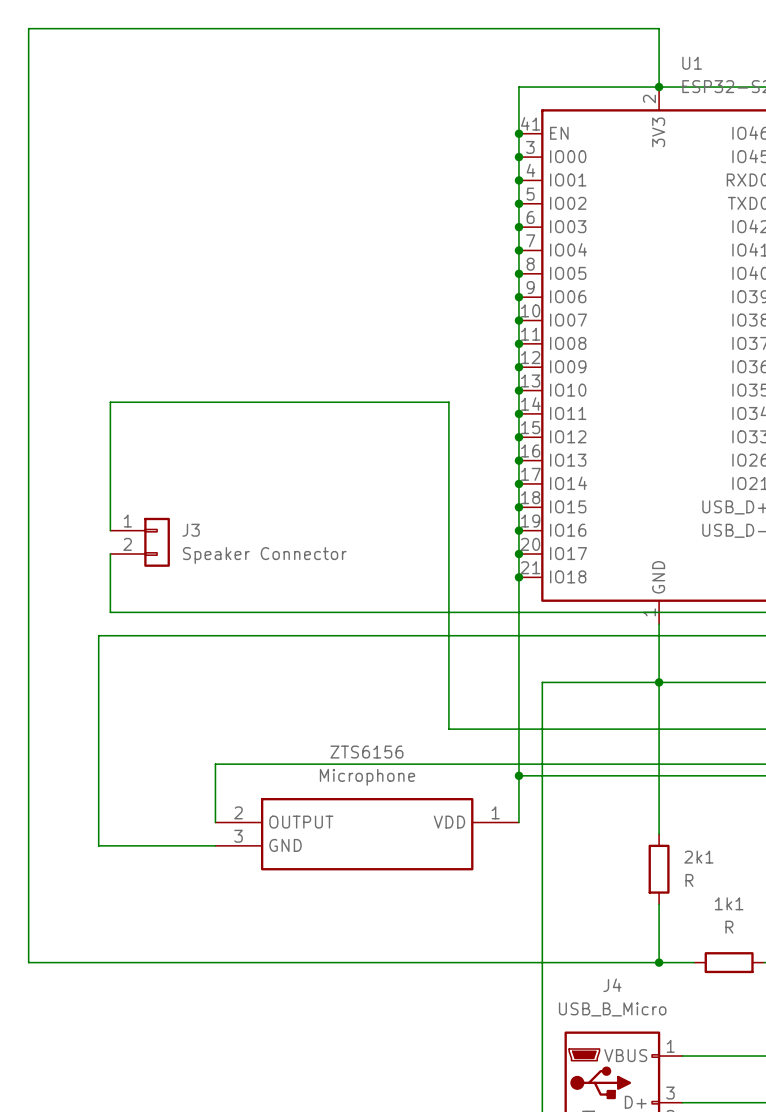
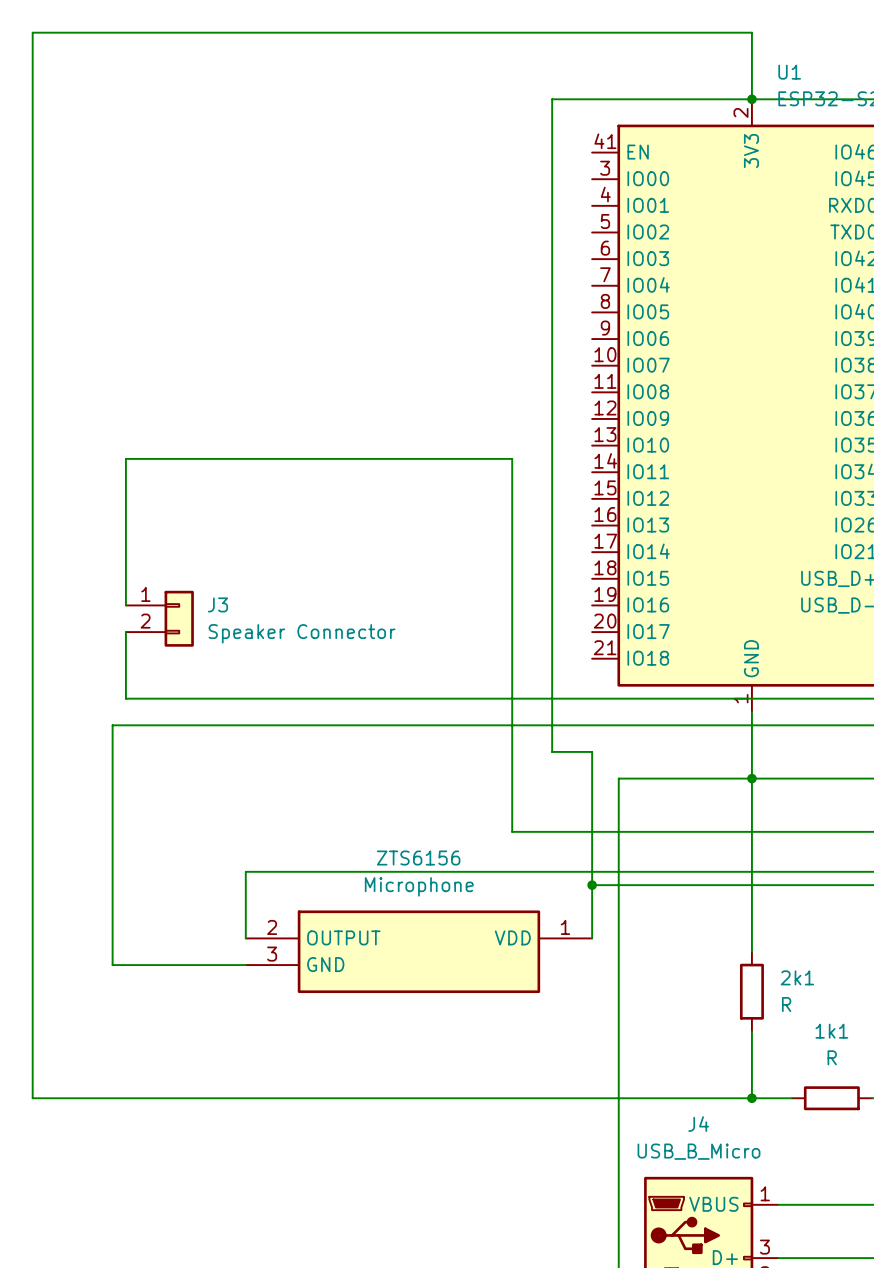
wire: (518, 87) (518, 659) -> (592, 99) (552, 99) (552, 751) (592, 751)
junction: (518, 133) -> none
junction: (518, 157) -> none
junction: (518, 180) -> none
junction: (518, 203) -> none
junction: (518, 227) -> none
junction: (518, 250) -> none
junction: (518, 273) -> none
junction: (518, 297) -> none
junction: (518, 320) -> none
junction: (518, 343) -> none
junction: (518, 367) -> none
junction: (518, 390) -> none
junction: (518, 413) -> none
junction: (518, 437) -> none
junction: (518, 460) -> none
junction: (518, 483) -> none
junction: (518, 507) -> none
junction: (518, 530) -> none
junction: (518, 554) -> none
junction: (518, 577) -> none

